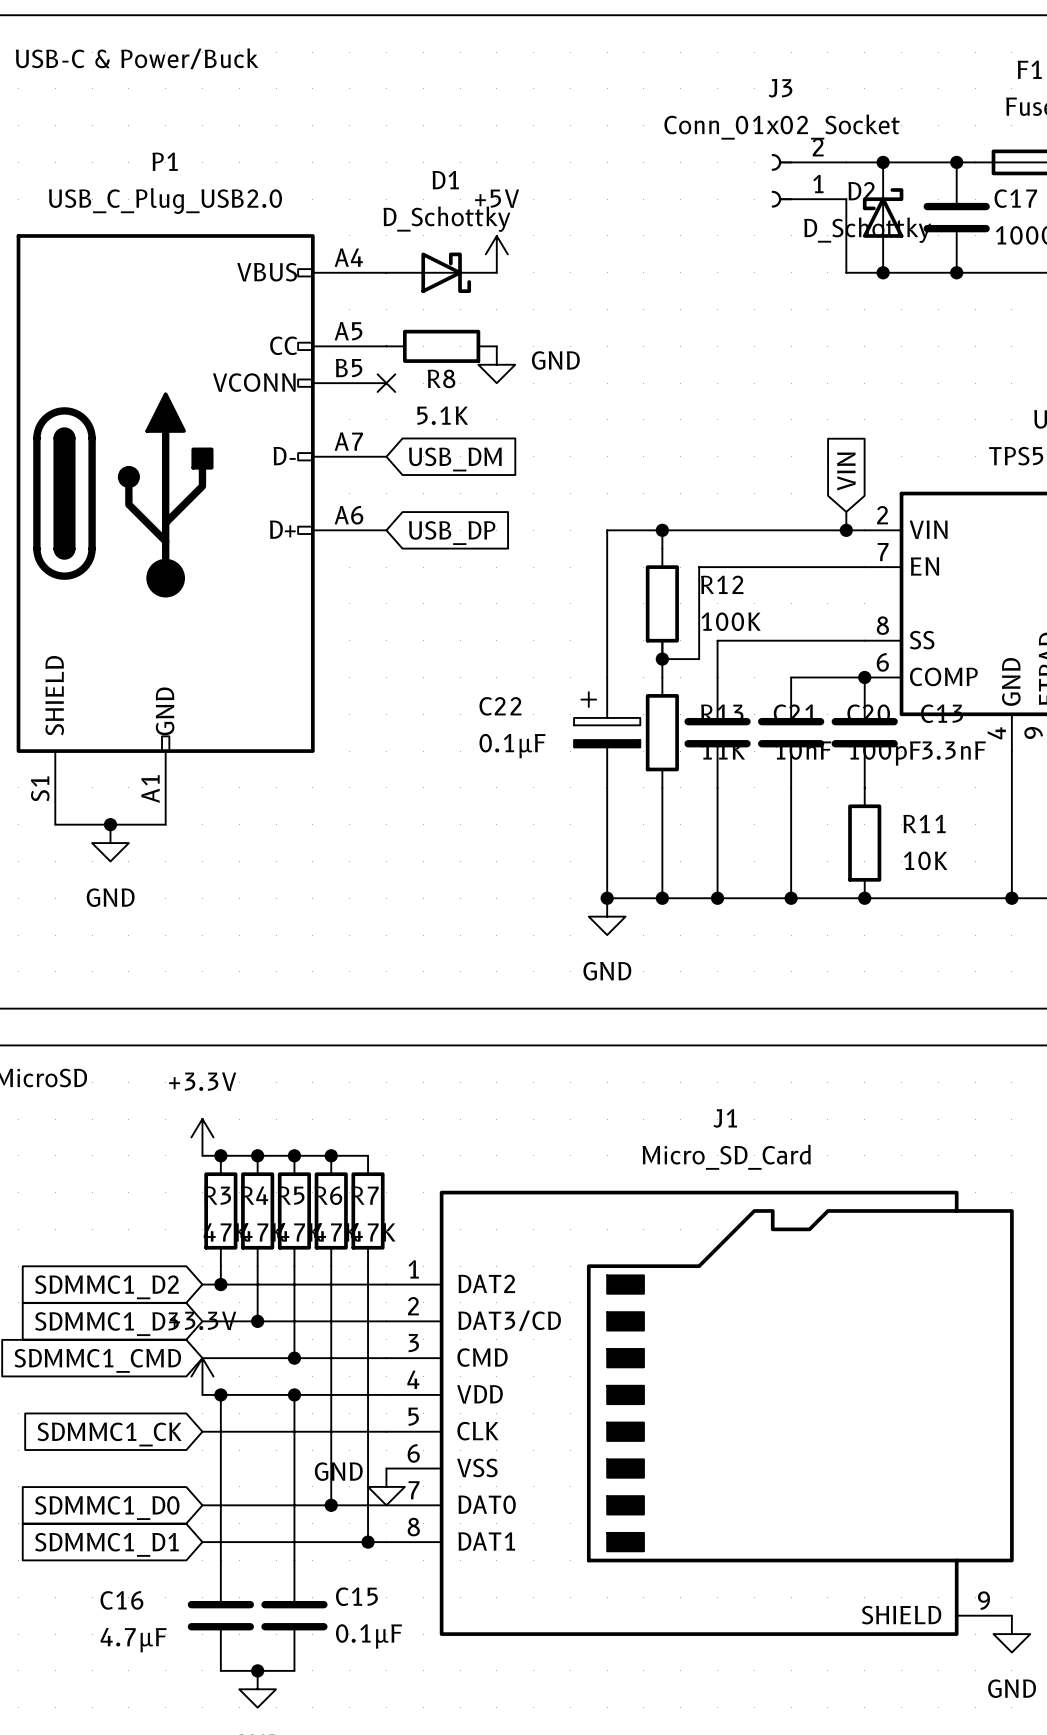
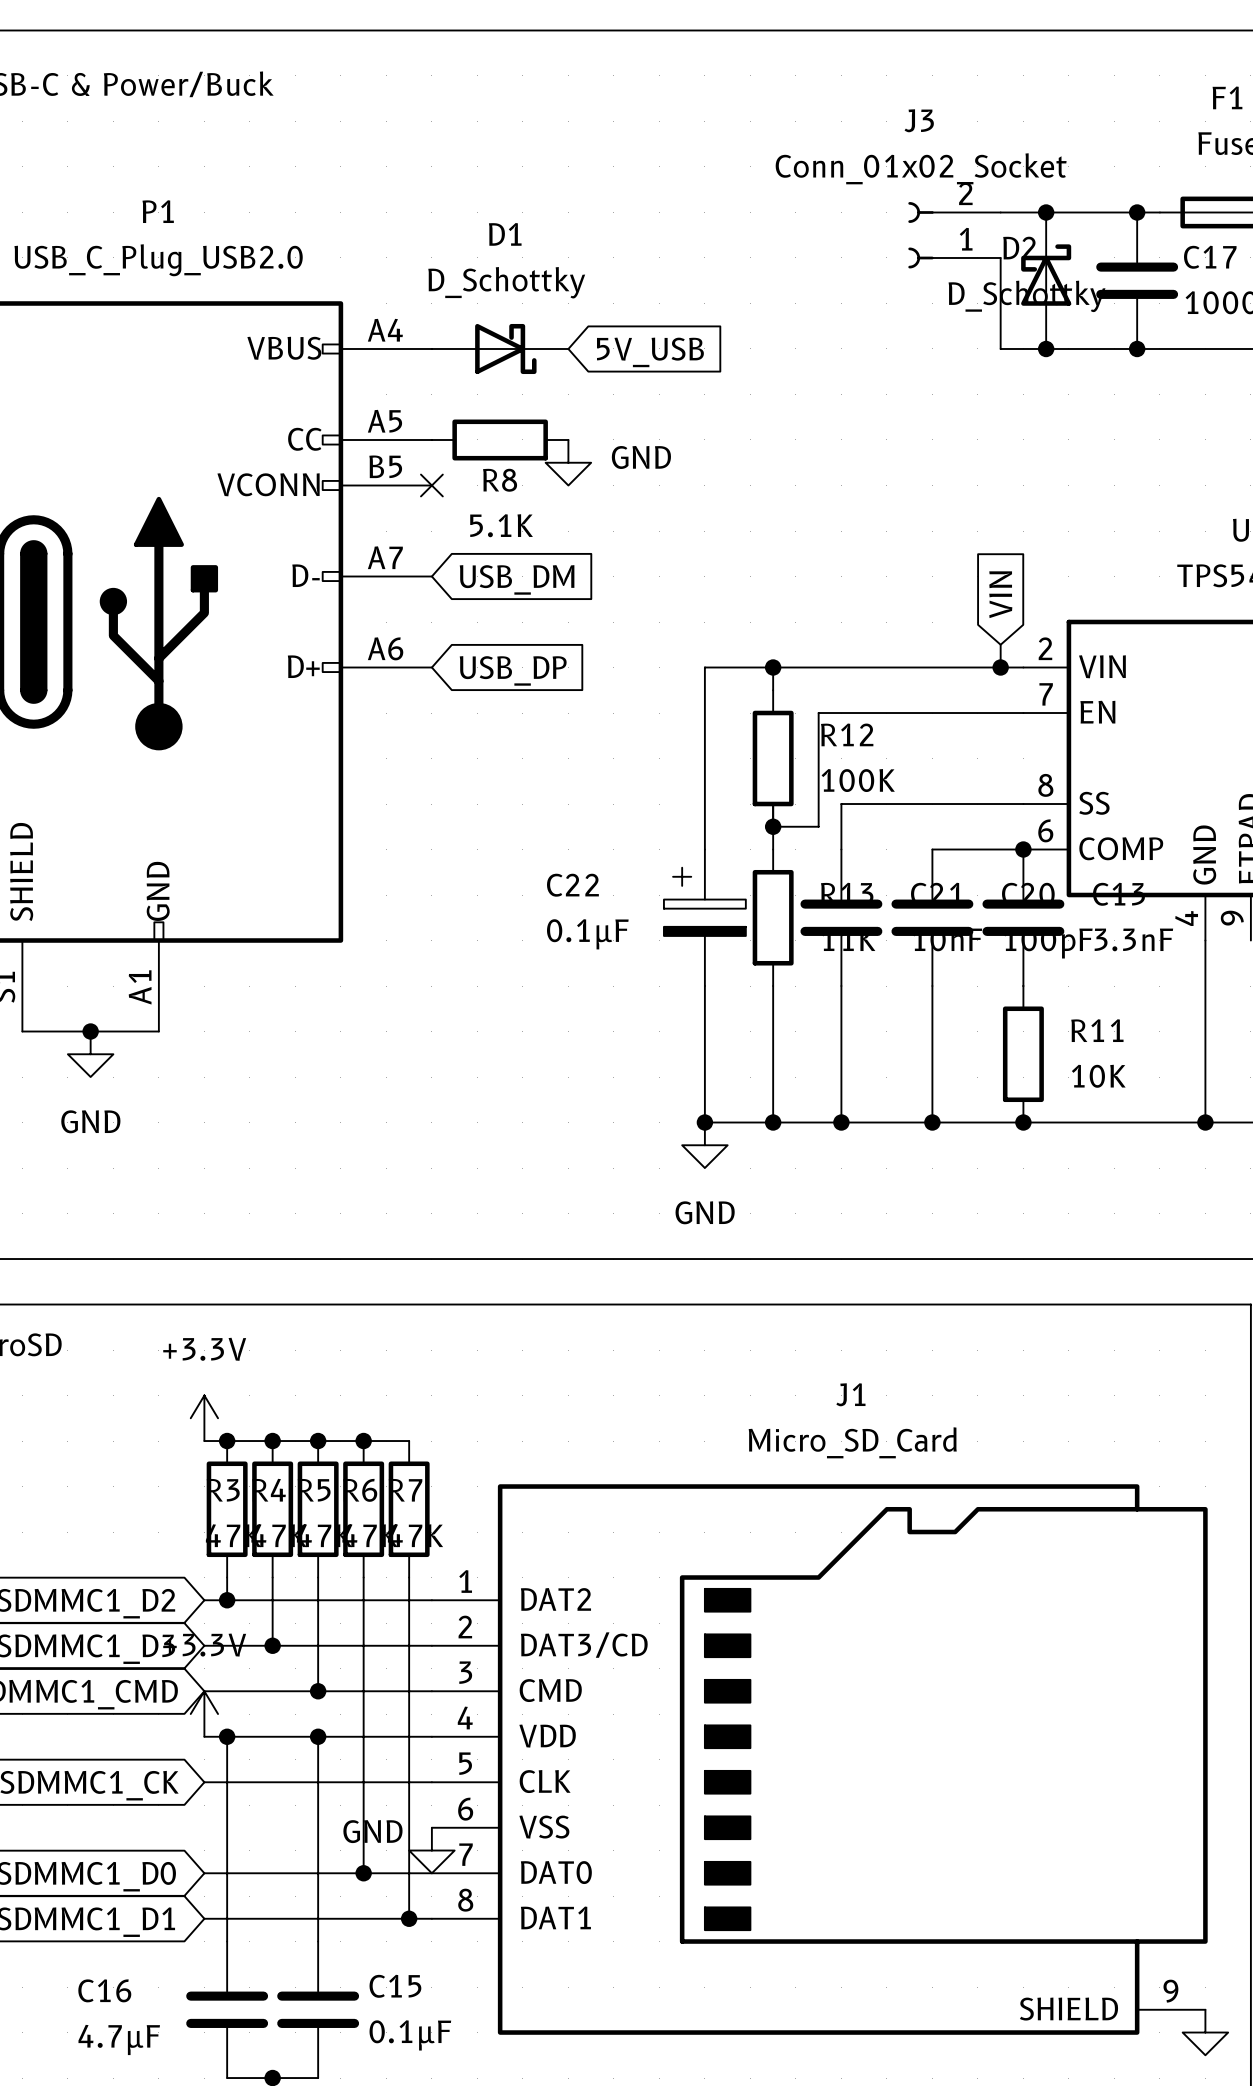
power symbol: +5V (496, 254) -> none
global label: none -> 5V_USB (650, 352)

